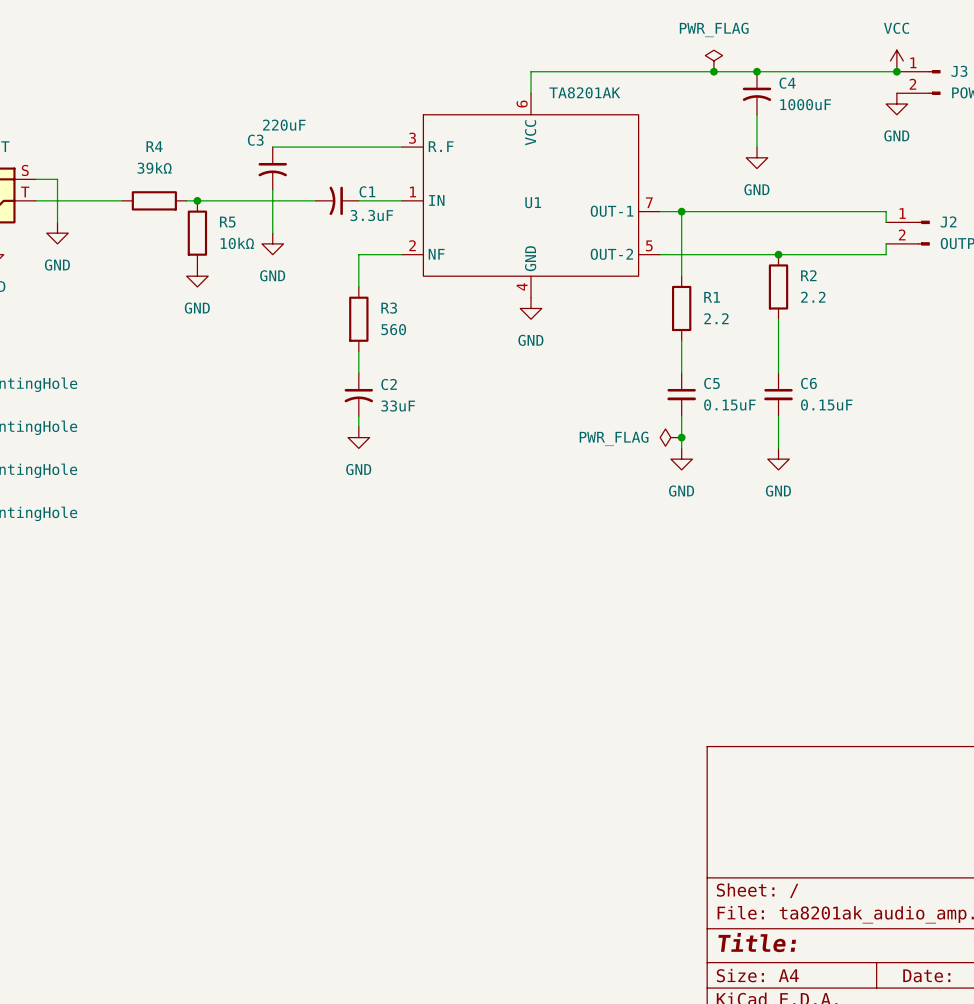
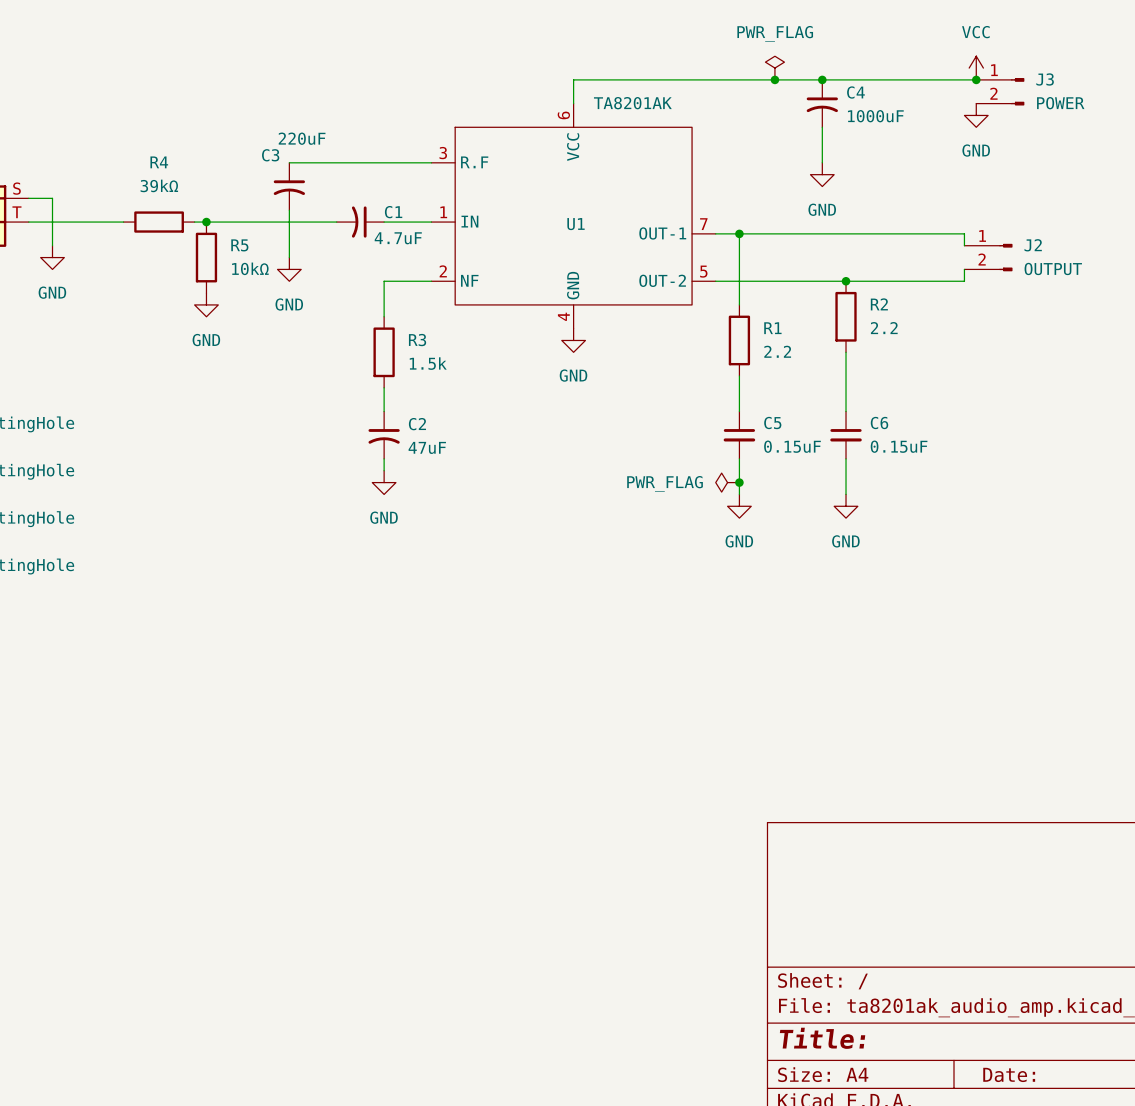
C1 value: 3.3uF (371, 215) -> 4.7uF (398, 238)
R3 value: 560 (393, 329) -> 1.5k (428, 363)
C2 value: 33uF (398, 406) -> 47uF (427, 447)

